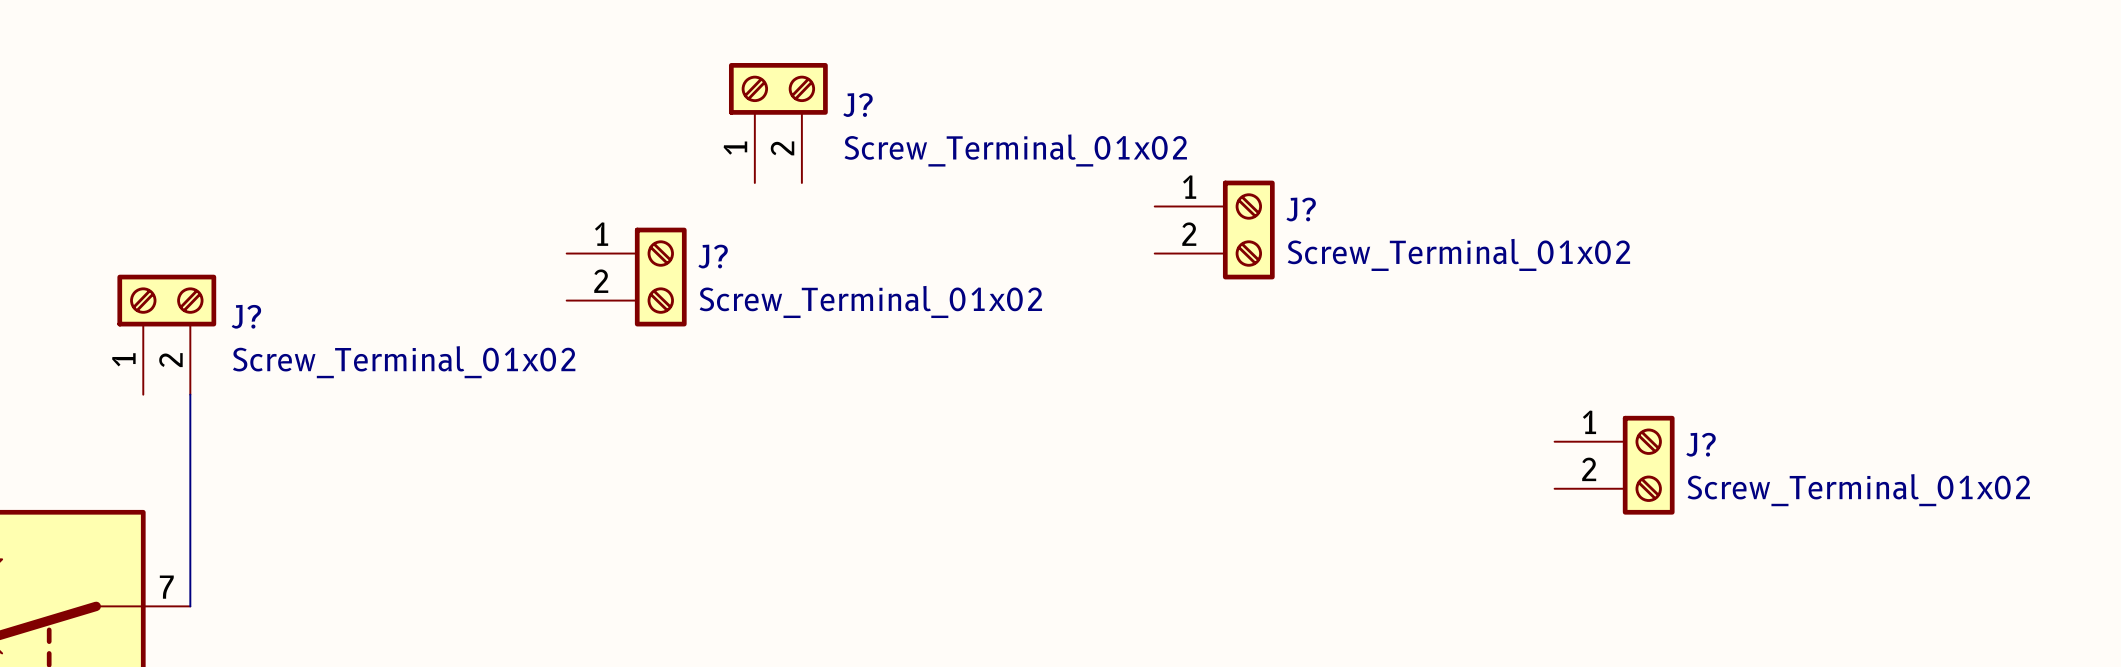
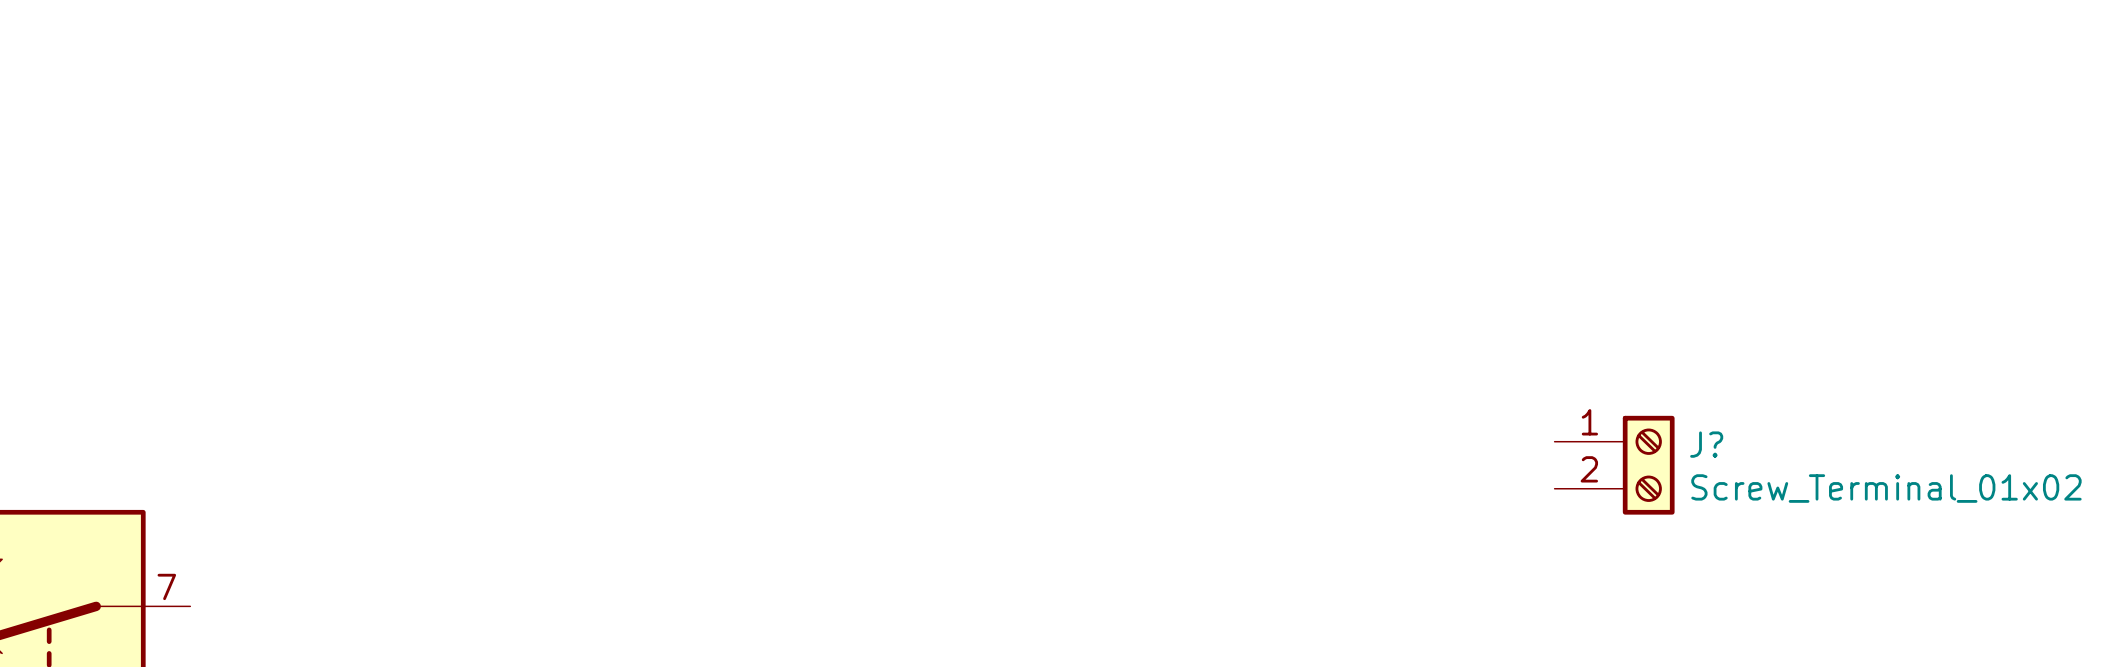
J?: Screw_Terminal_01x02 (778, 122) -> none
J?: Screw_Terminal_01x02 (1214, 230) -> none
J?: Screw_Terminal_01x02 (626, 277) -> none
J?: Screw_Terminal_01x02 (166, 334) -> none
wire: (190, 394) (190, 606) -> none

